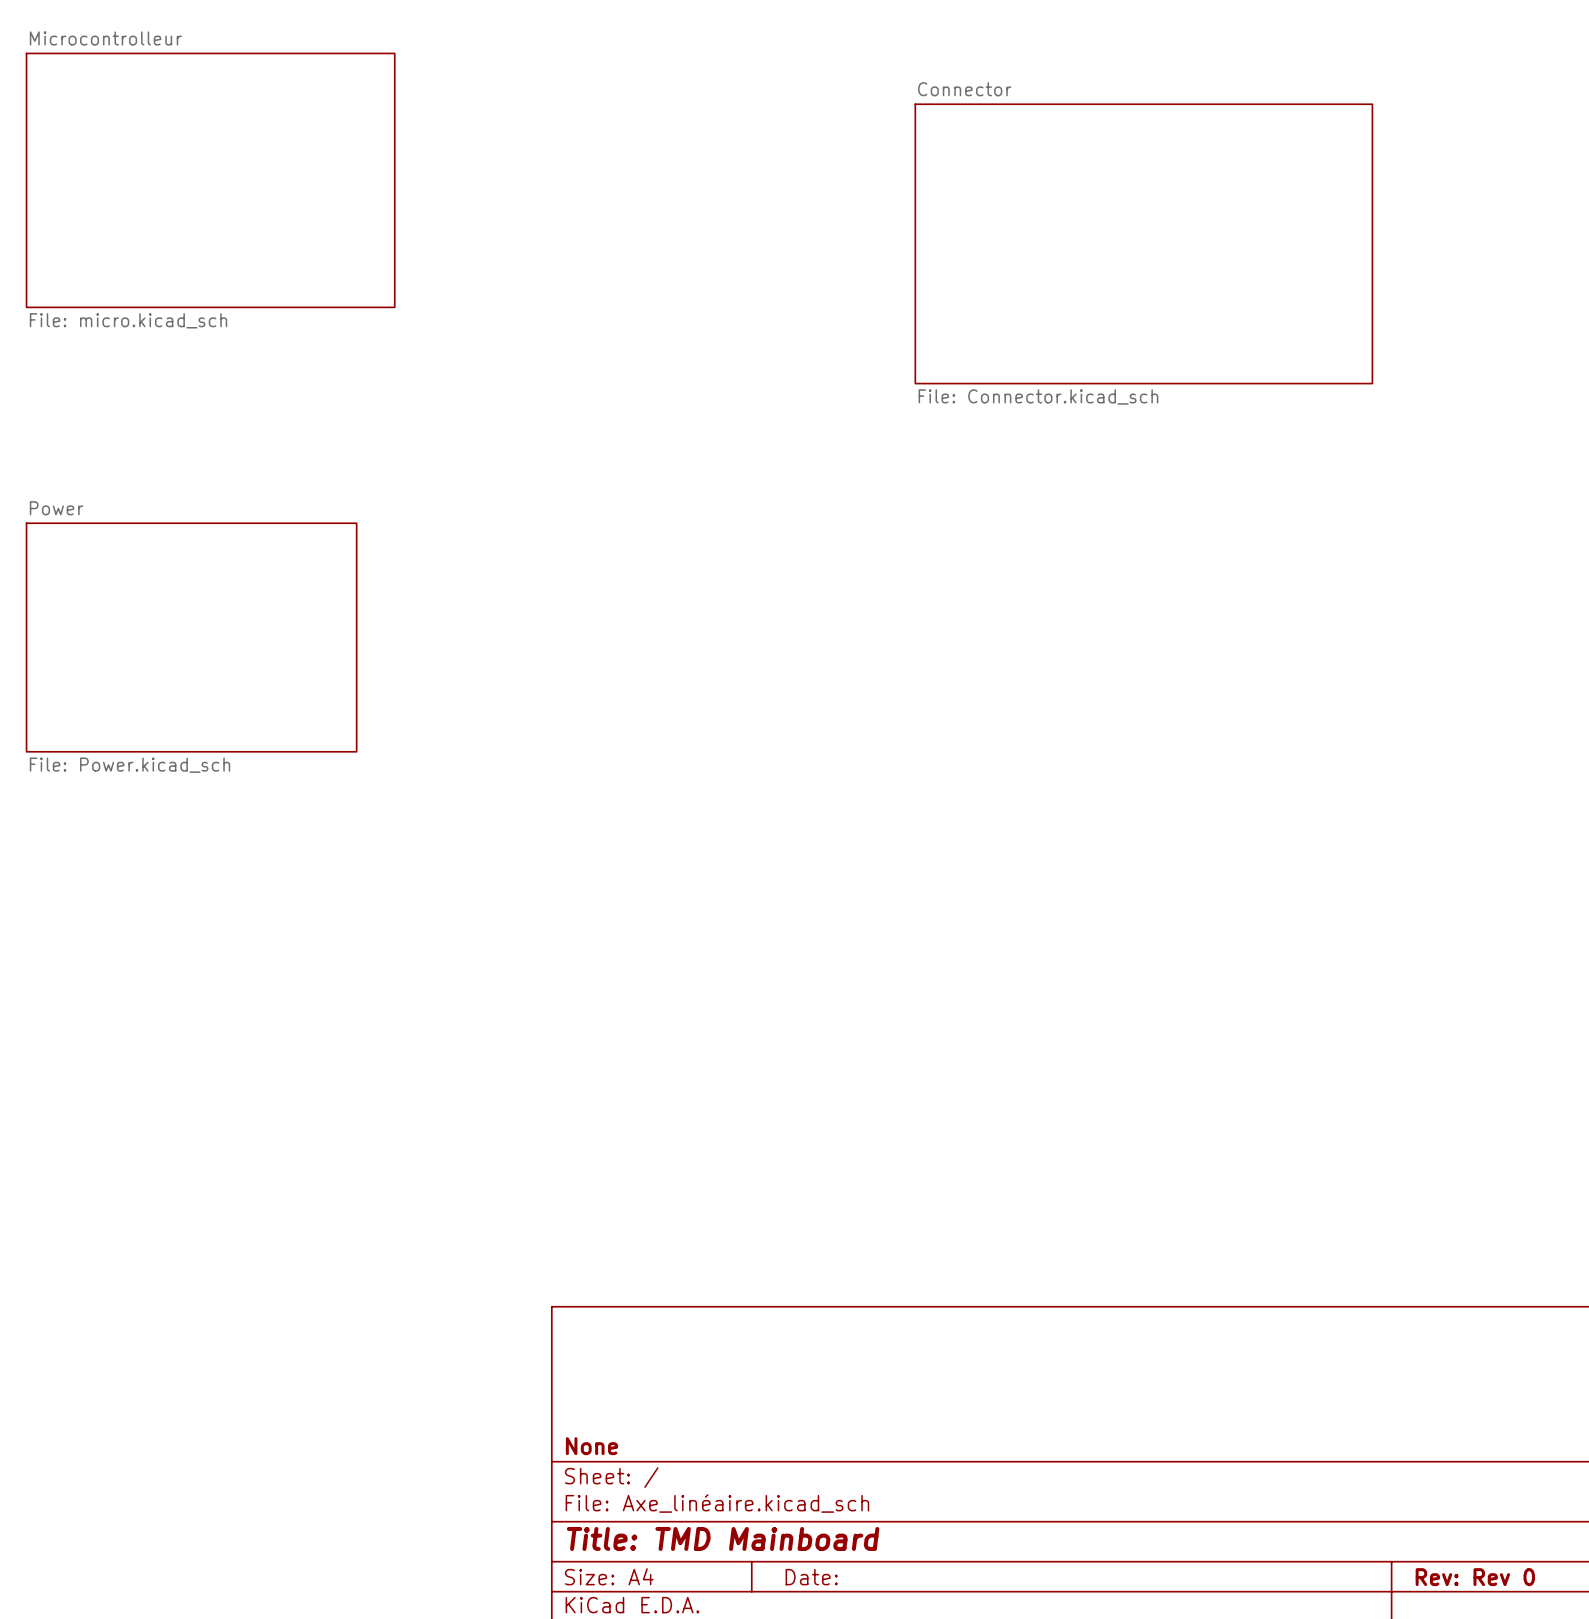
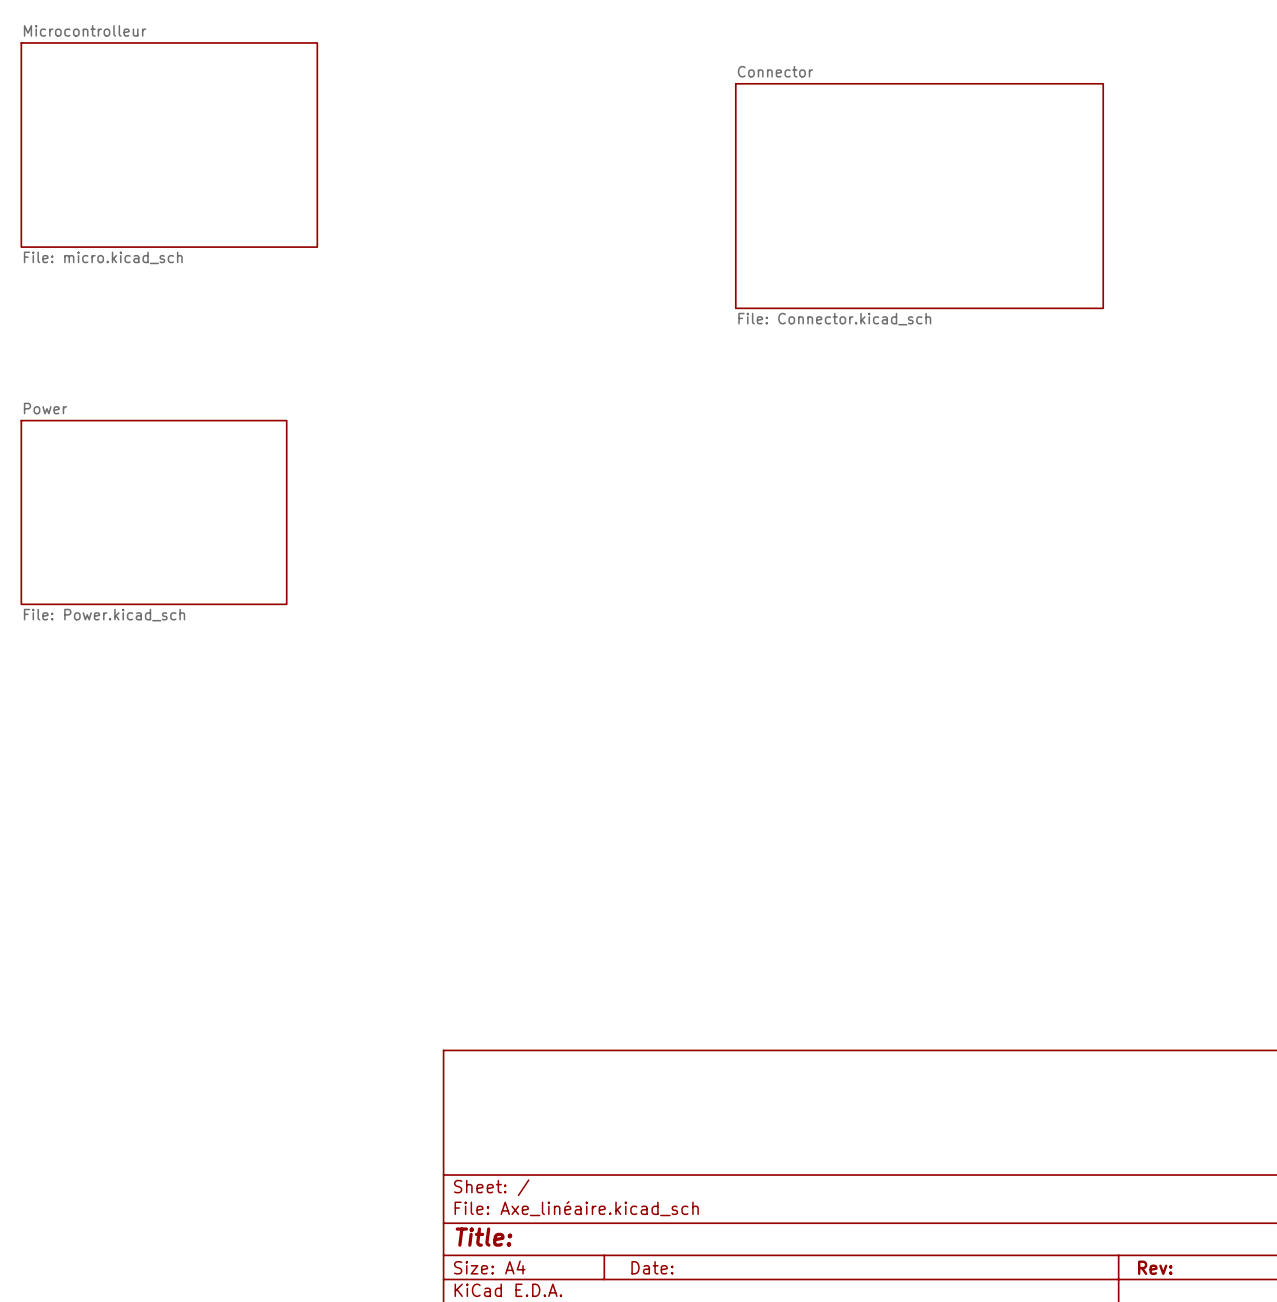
title block: None (591, 1446) -> none
title block: Title: TMD Mainboard (723, 1538) -> Title: (484, 1237)
title block: Rev: Rev 0 (1475, 1577) -> Rev: (1155, 1267)

